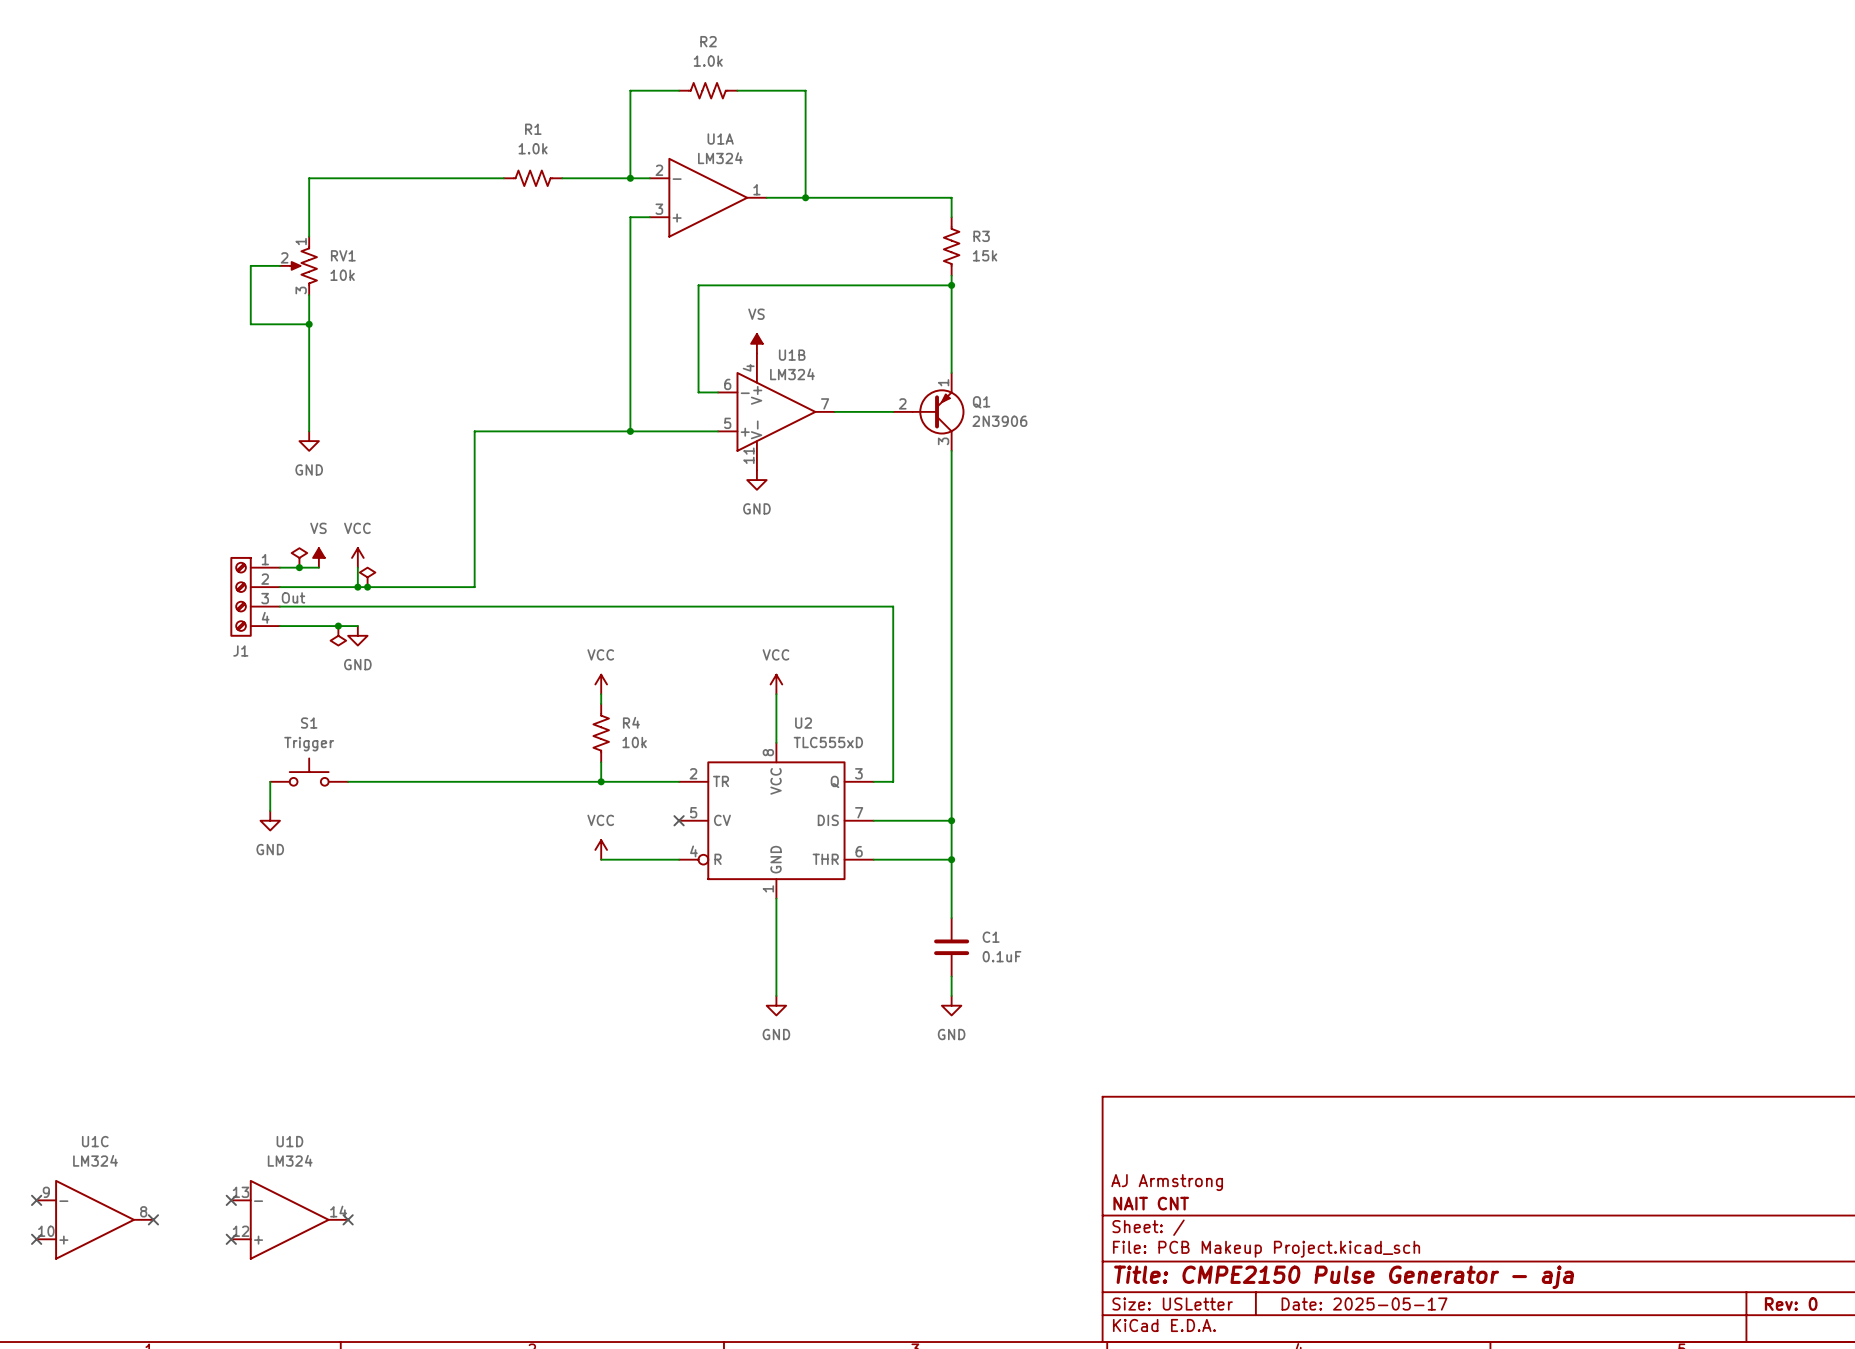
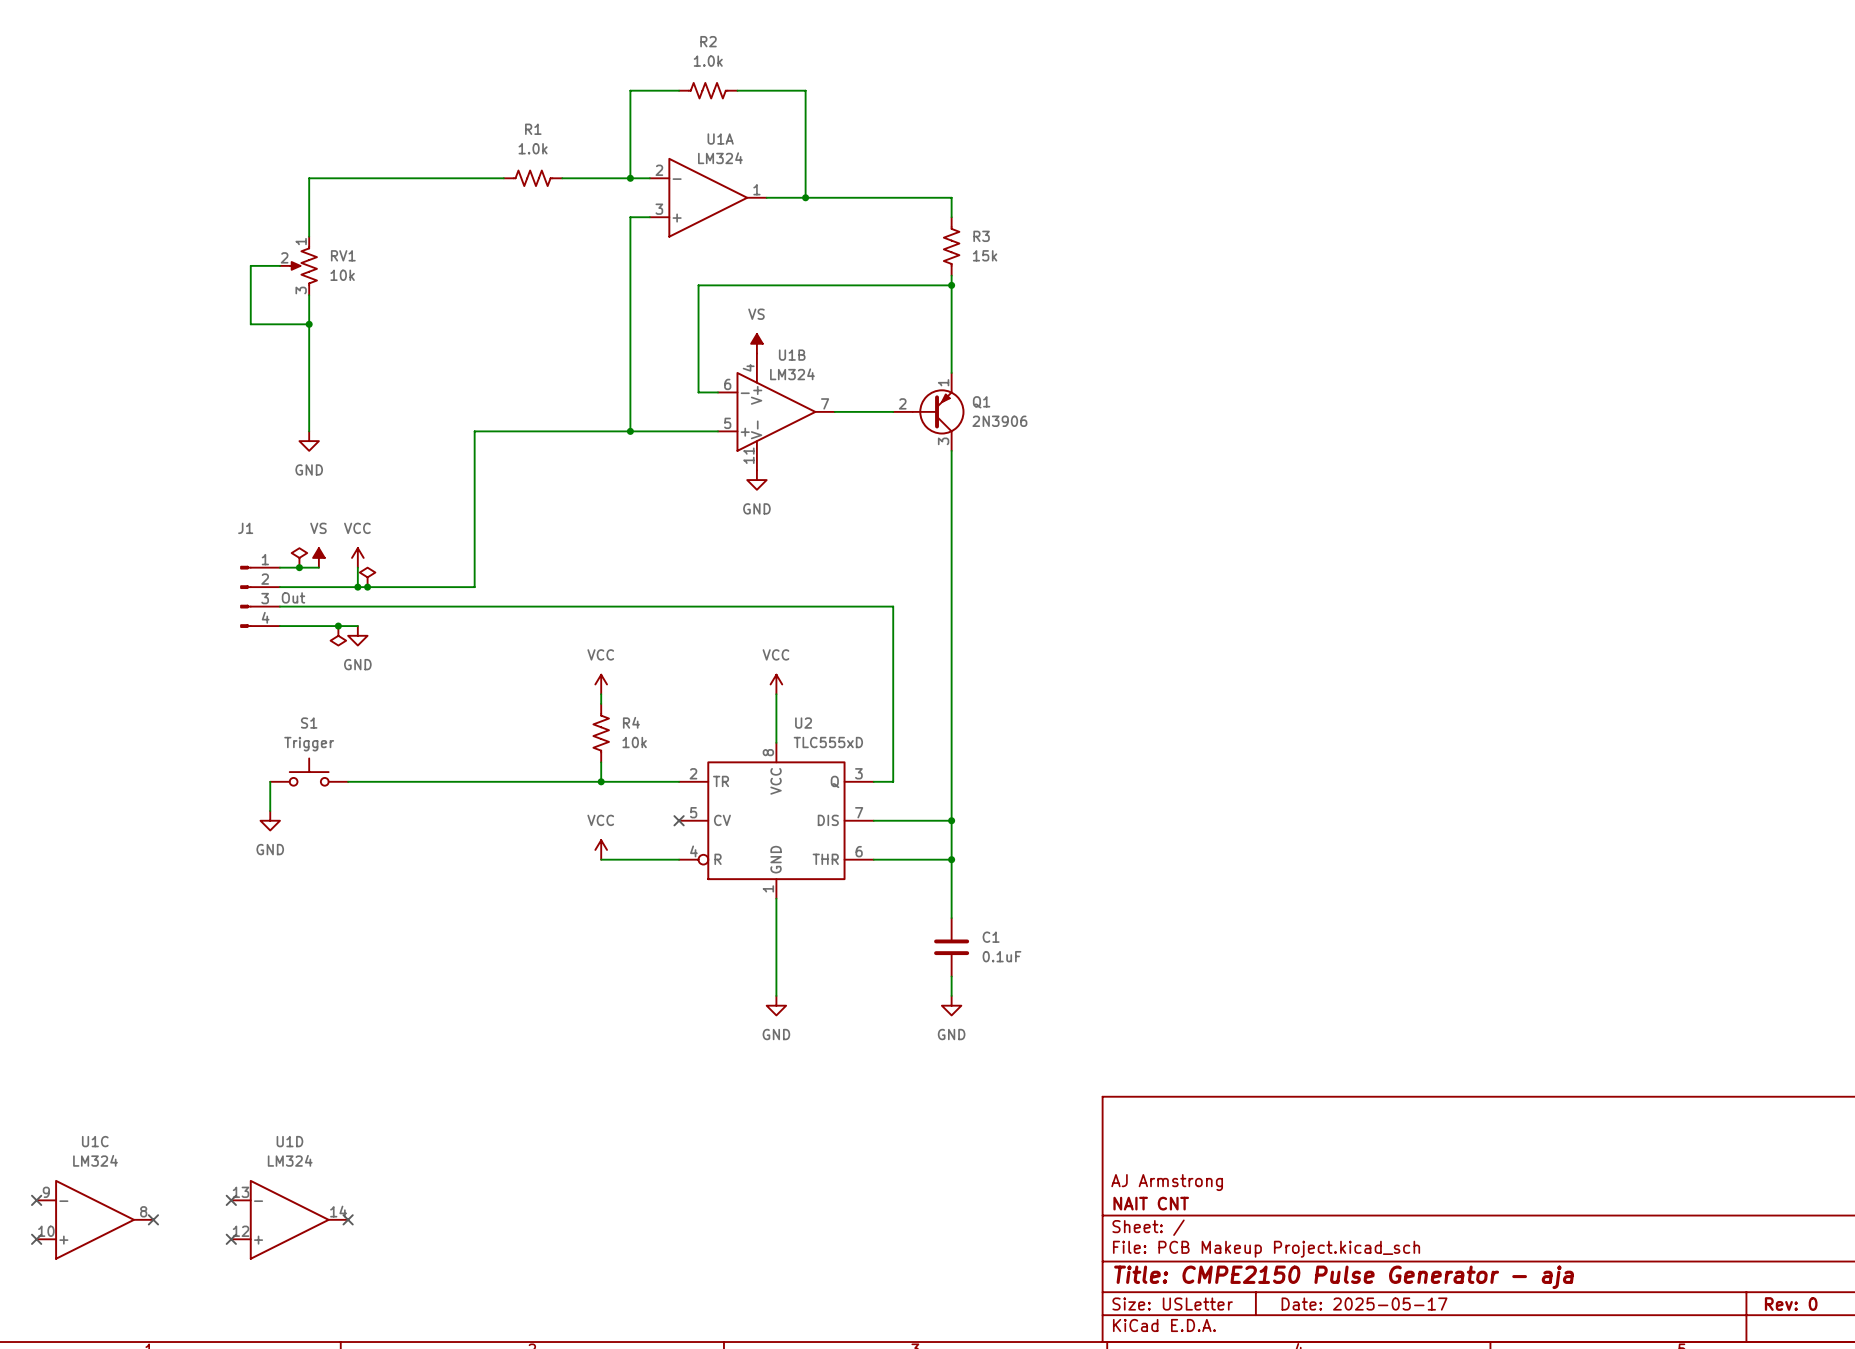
J1 symbol: [230, 556, 280, 637] -> [240, 566, 280, 628]
J1 name position: J1 (240, 651) -> J1 (245, 528)

